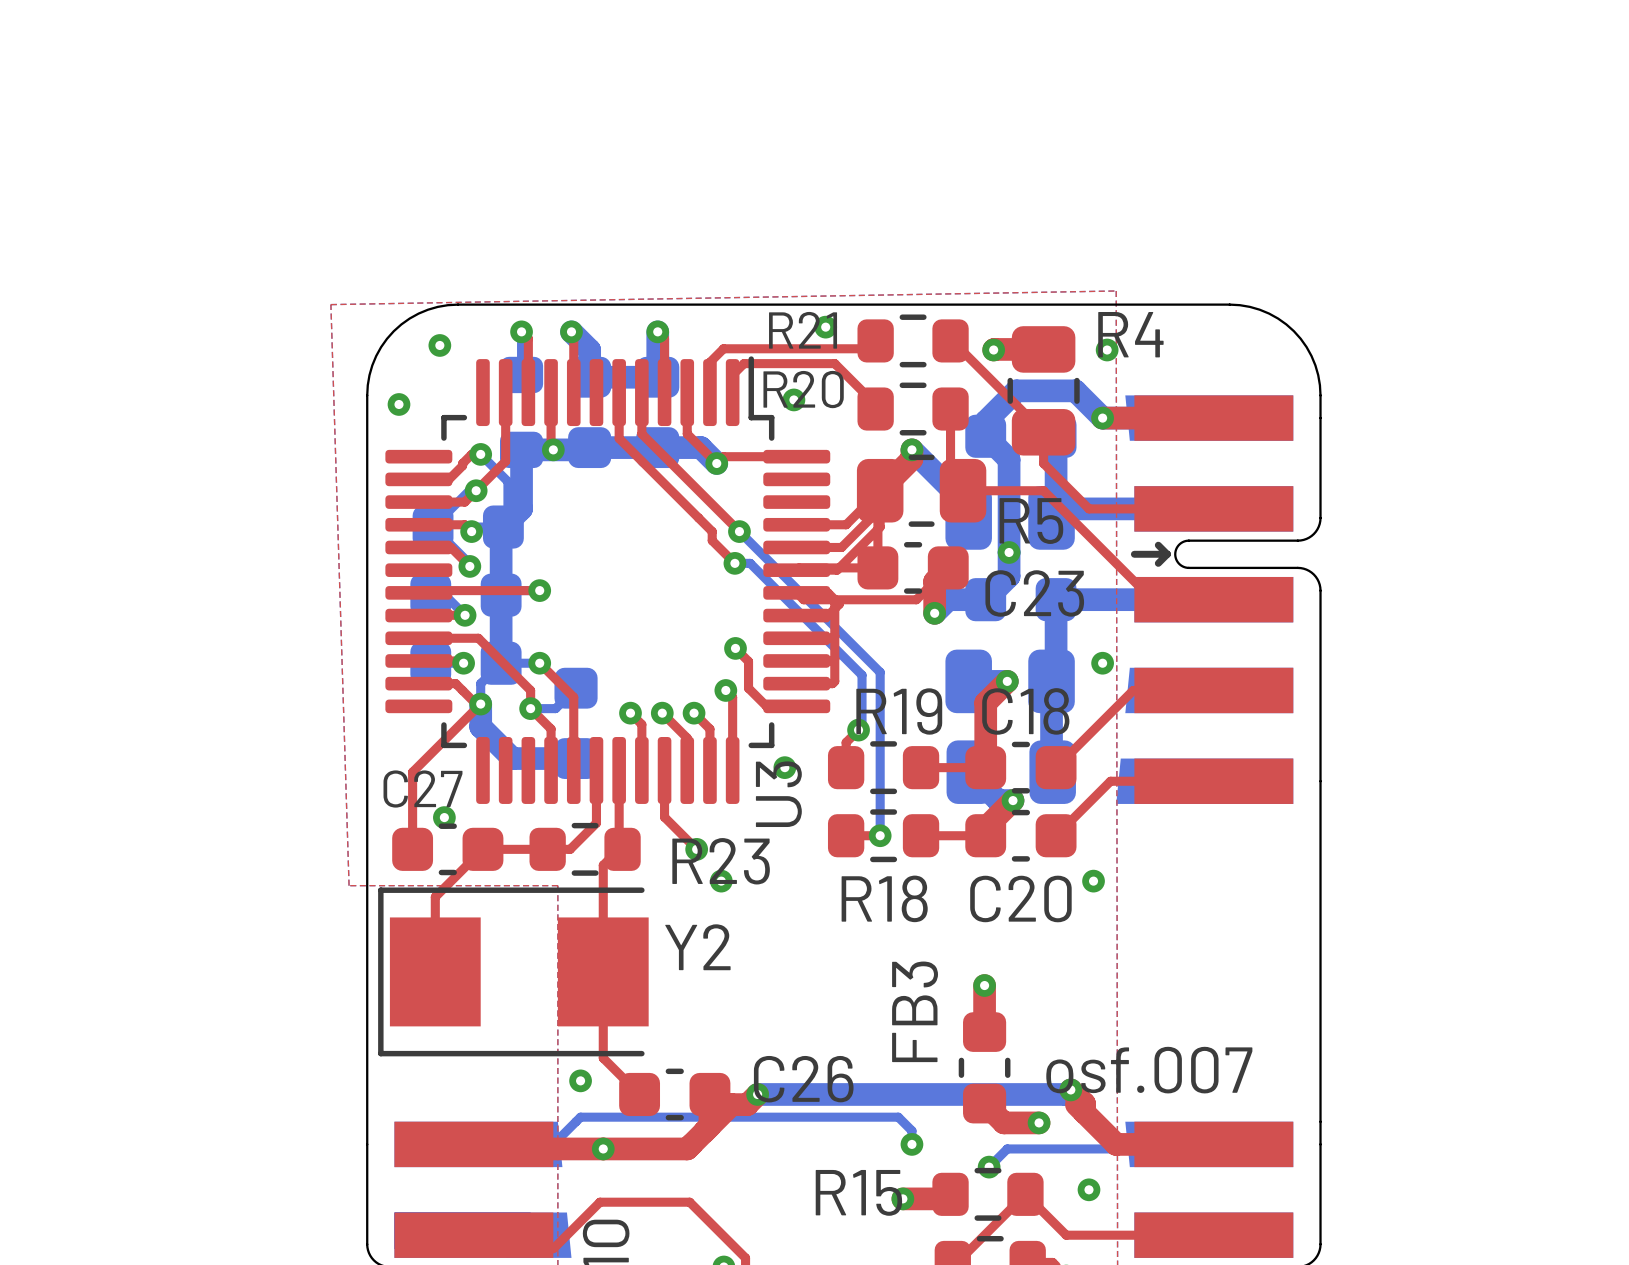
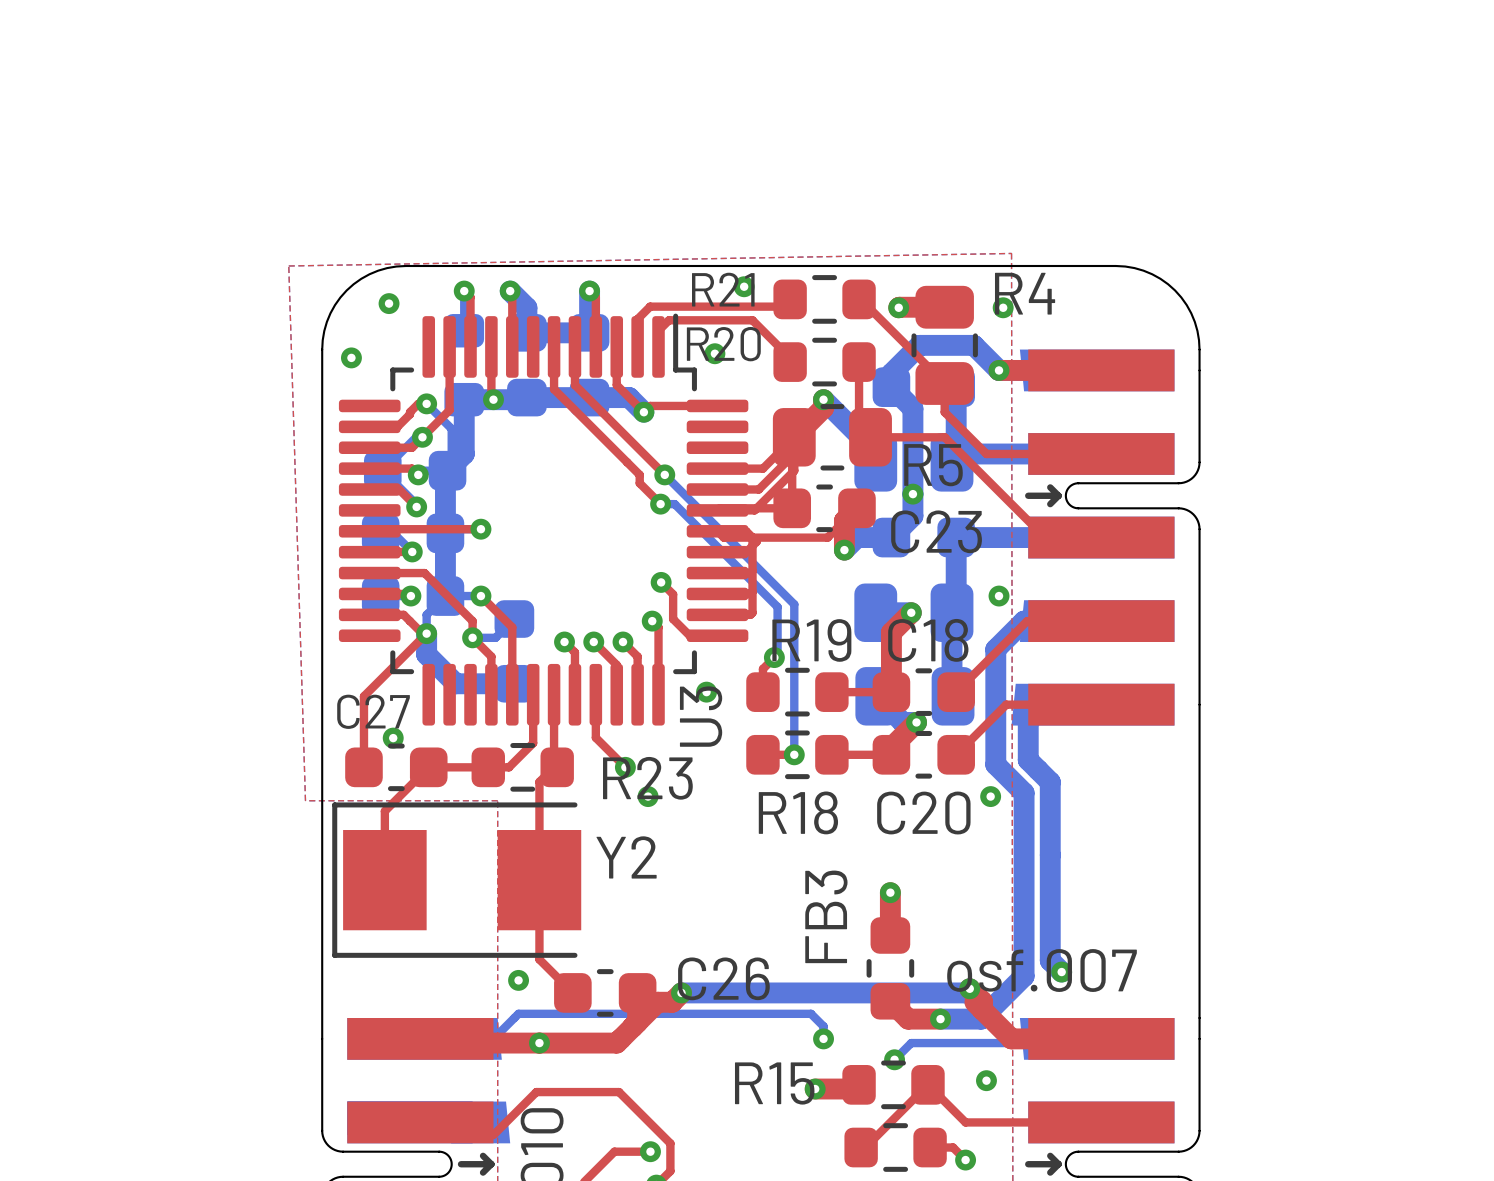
bottom track: none -> (1099, 621) (1024, 621) (995, 649) (995, 764) (1024, 792) (1024, 976) (981, 1019) (940, 1019)
bottom track: none -> (1095, 704) (1044, 704) (1028, 721) (1028, 760) (1050, 782) (1050, 960) (1061, 972)
via: none -> (1061, 972)

